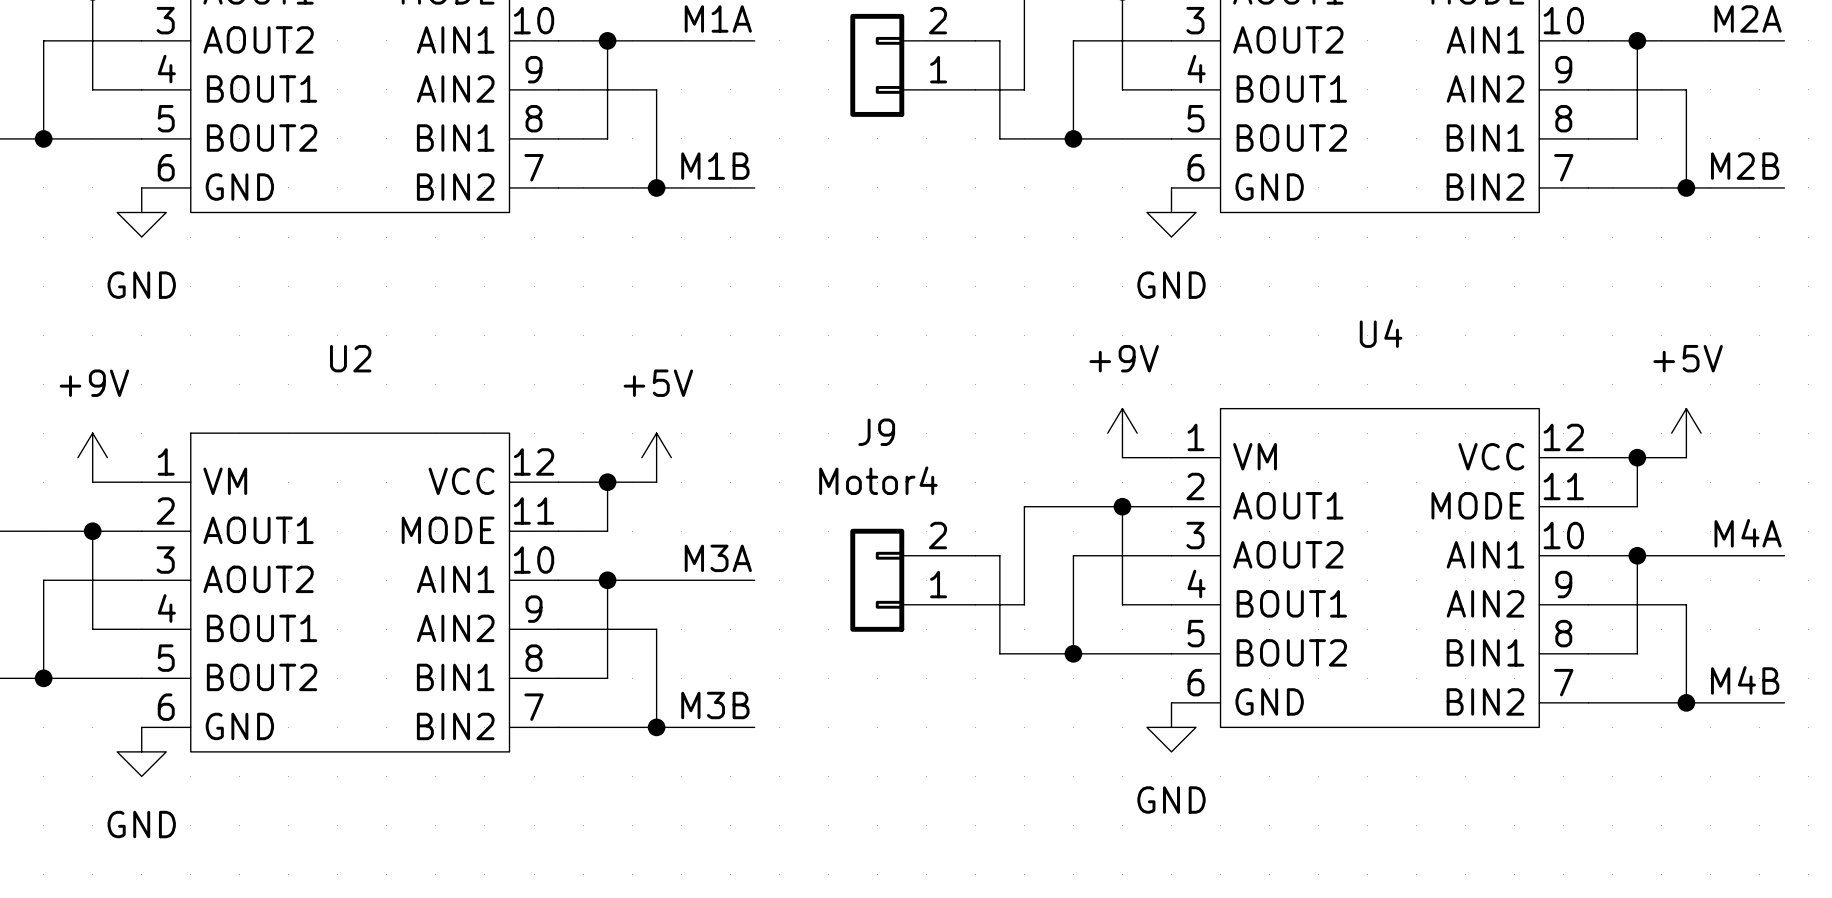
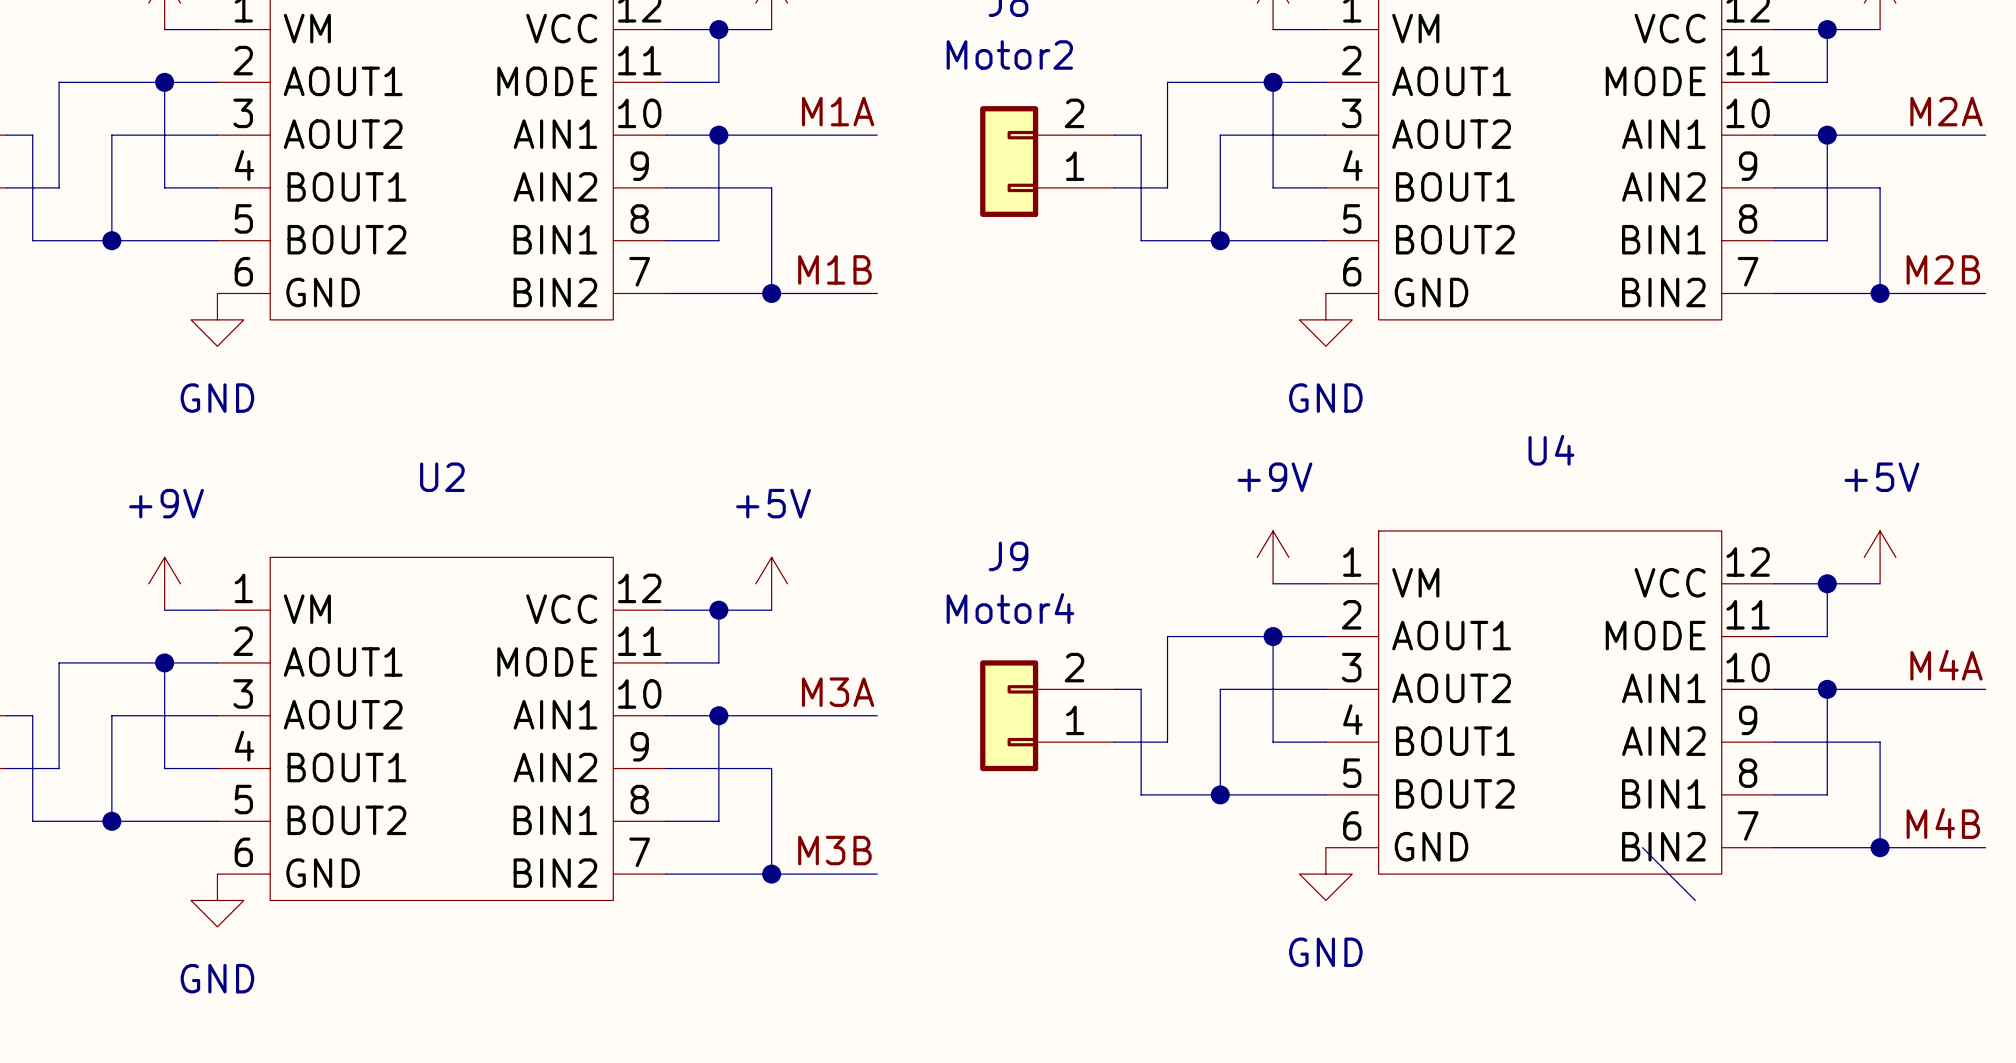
wire: none -> (1642, 847) (1695, 900)

